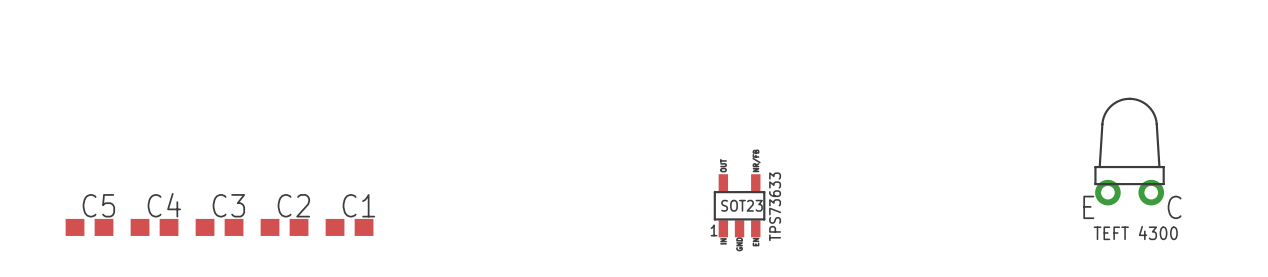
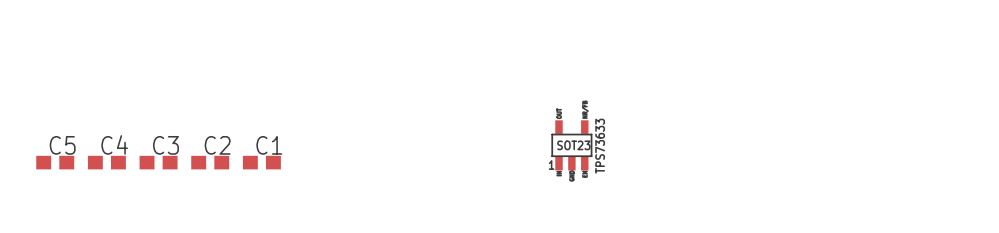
part: (1129, 151) -> none

